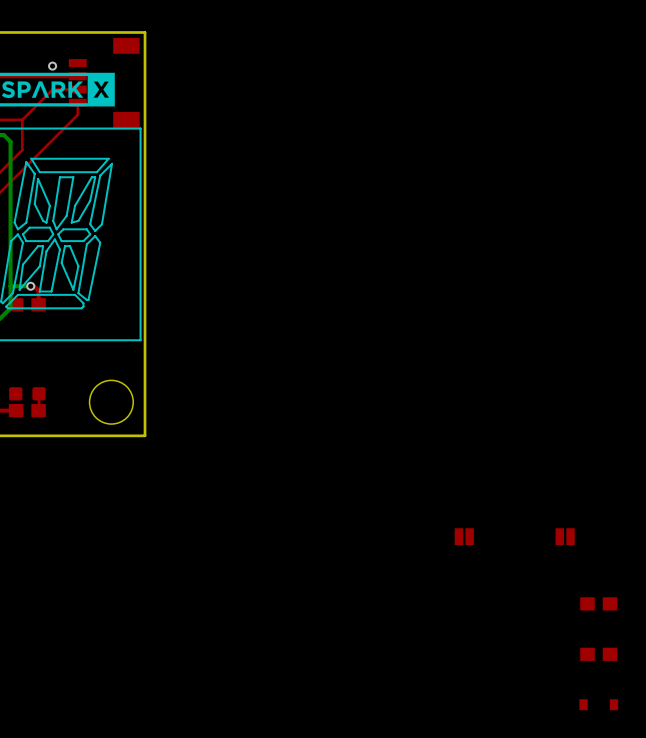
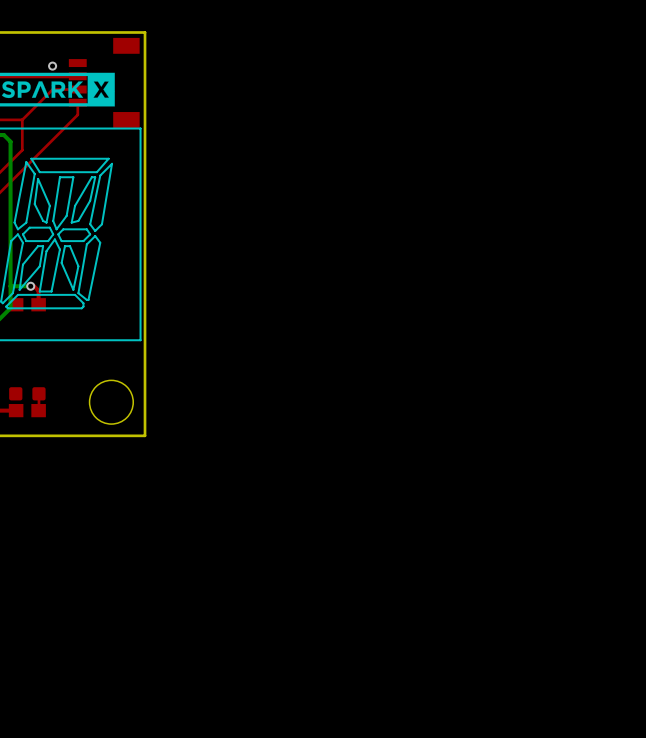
part: (464, 536) -> none
part: (565, 536) -> none
part: (598, 603) -> none
part: (598, 654) -> none
part: (598, 704) -> none

